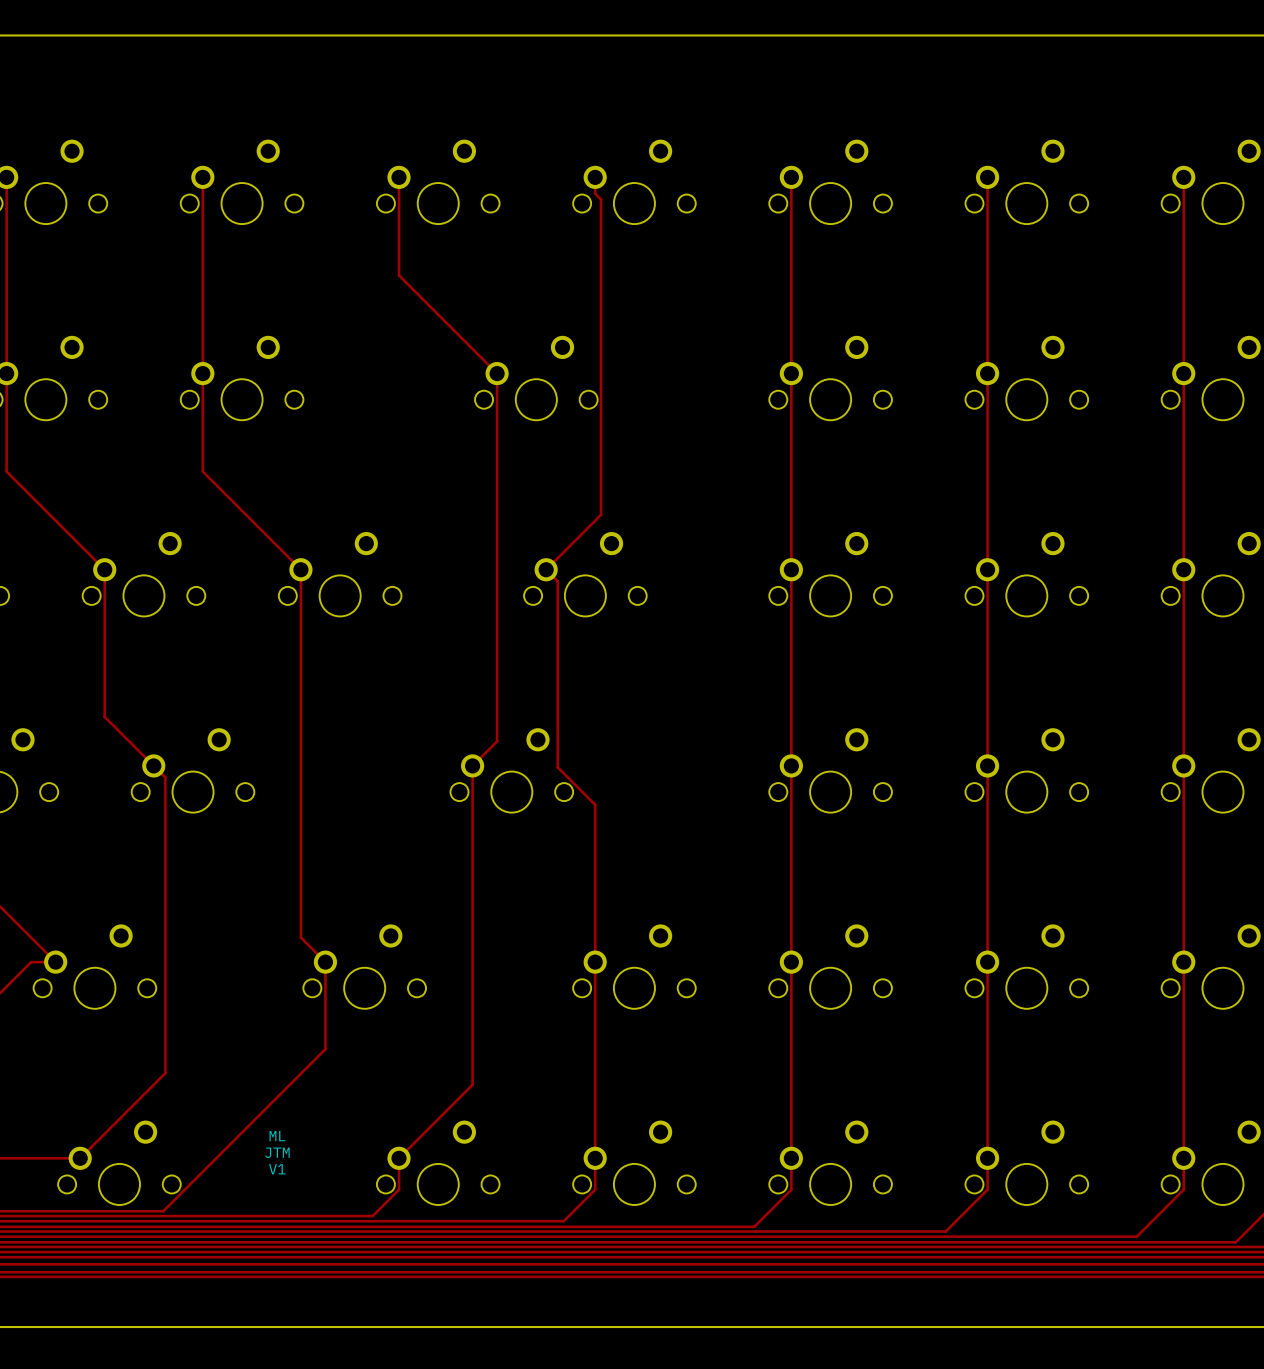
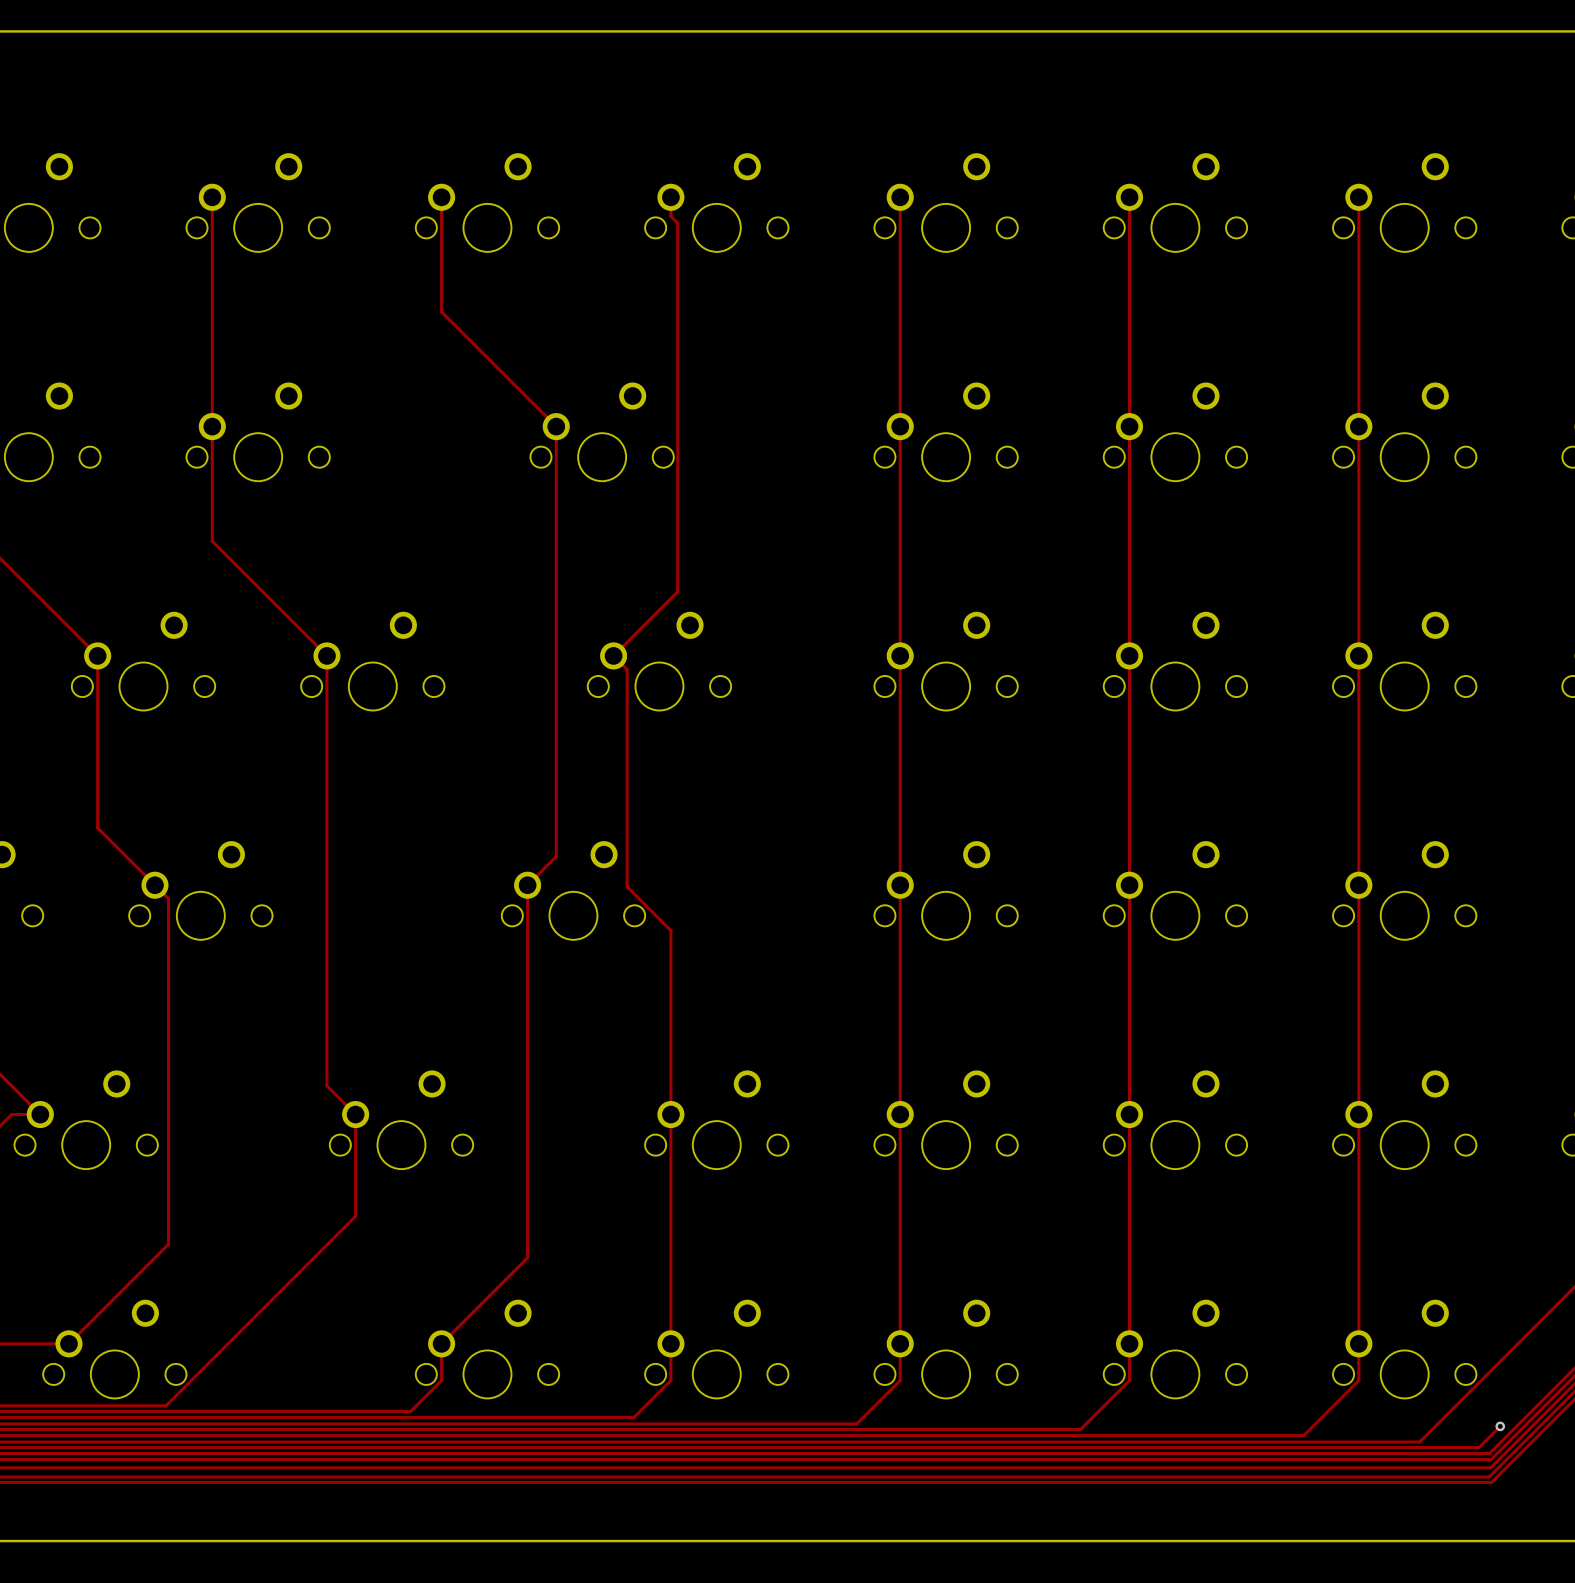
text: ML (277, 1136) -> none
text: JTM (277, 1152) -> none
text: V1 (277, 1169) -> none

